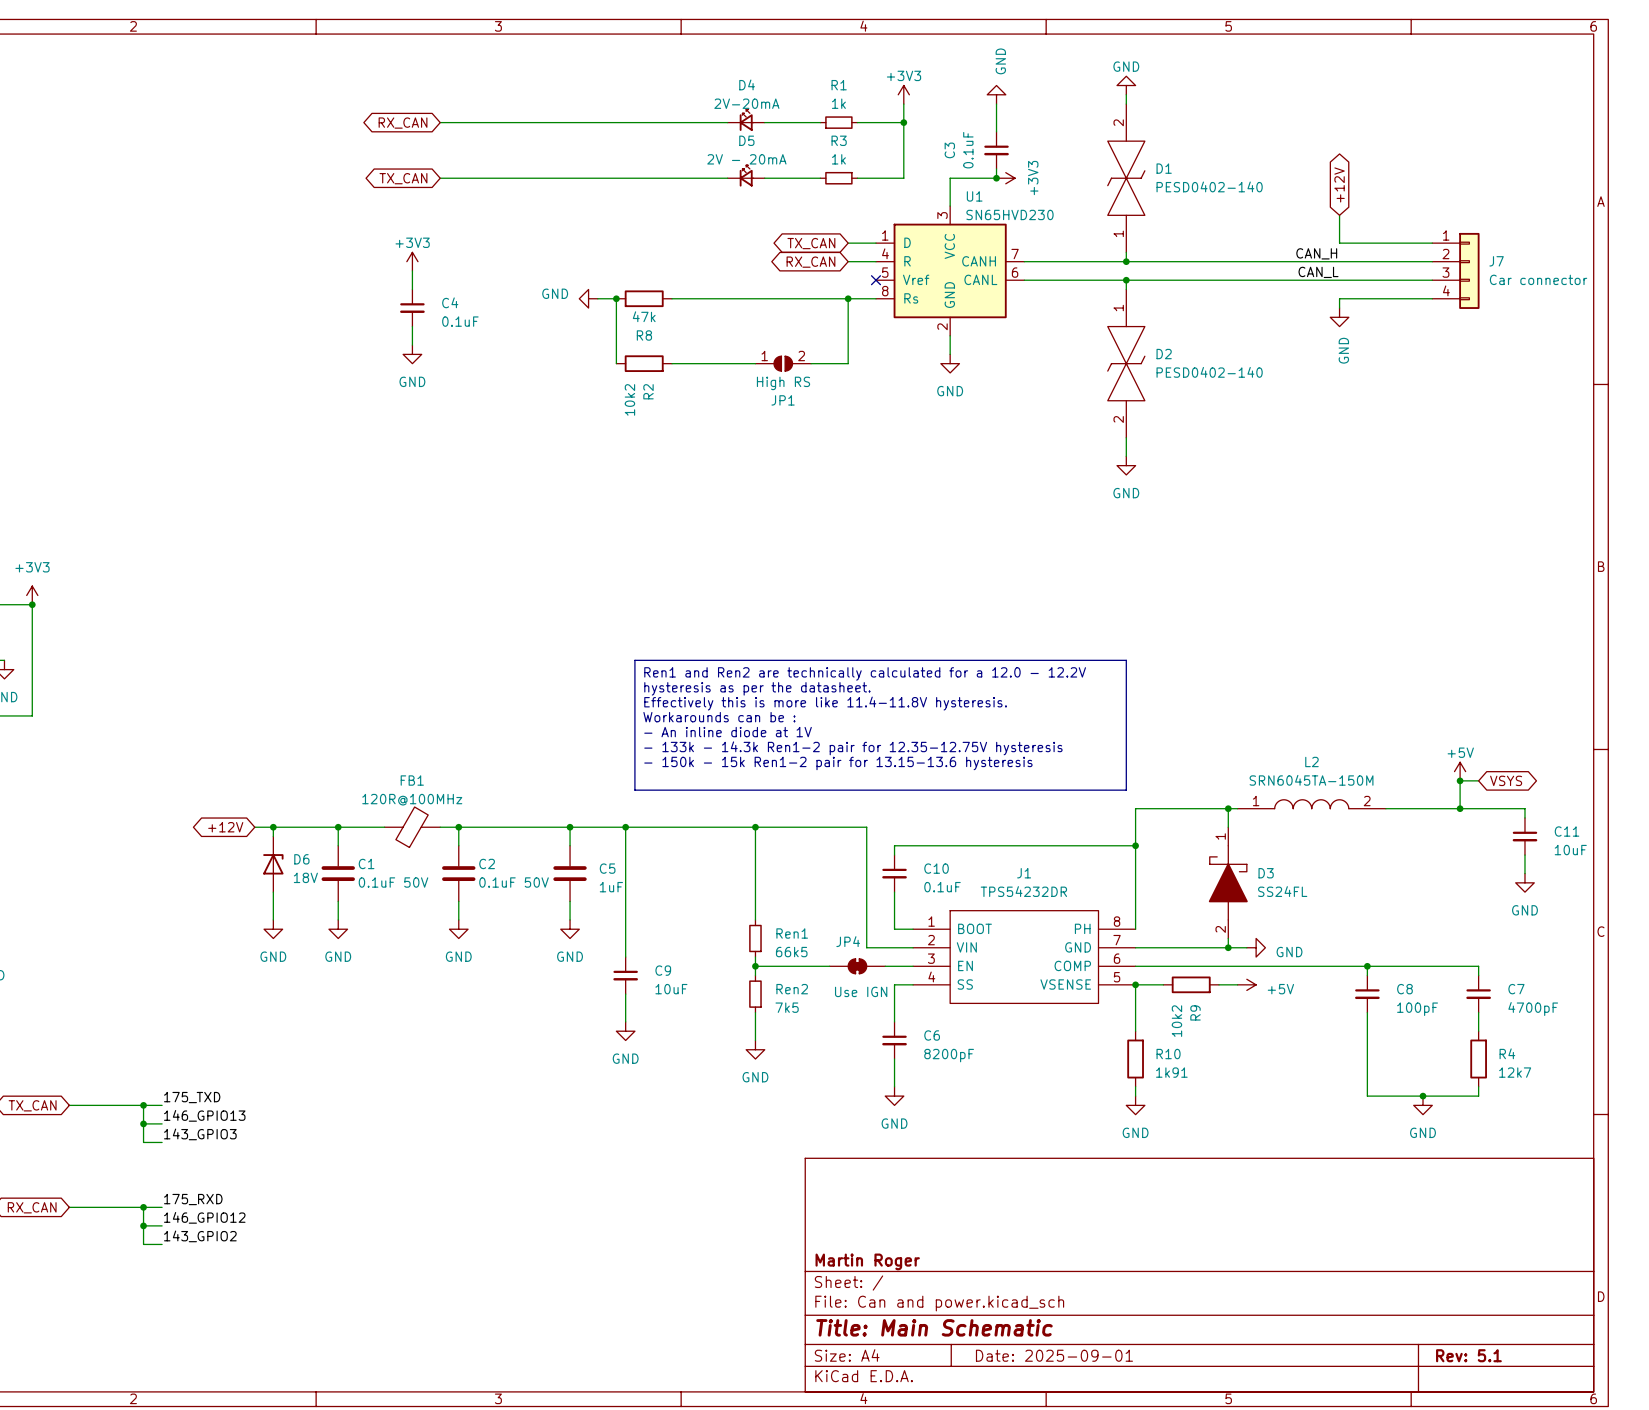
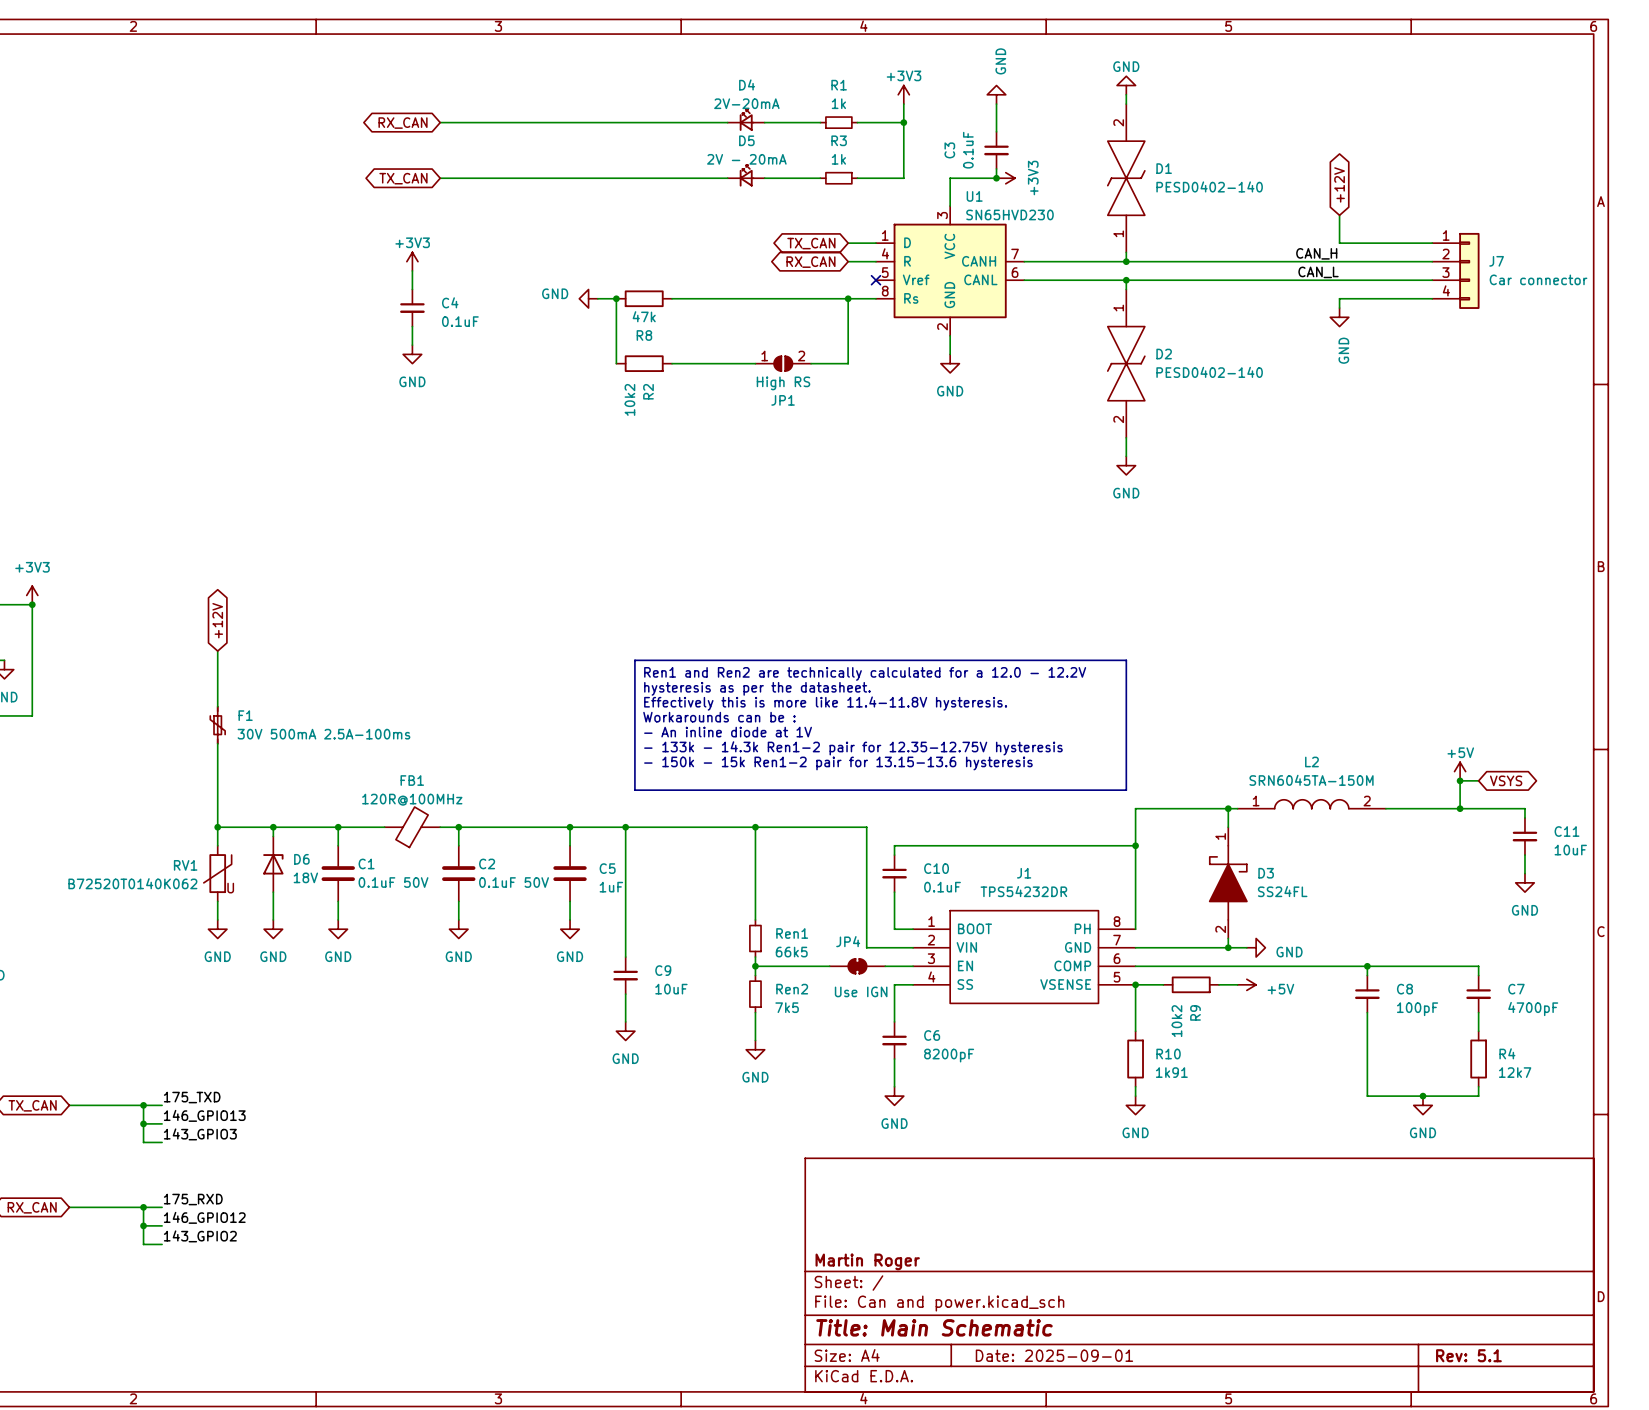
wire: none -> (217, 651) (217, 706)
F1: none -> 30V 500mA 2.5A-100ms (217, 725)
wire: none -> (217, 743) (217, 845)
wire: none -> (217, 827) (254, 827)
junction: none -> (217, 827)
global label rotation: 0° (225, 827) -> 90° clockwise (217, 620)
global label position: +12V (225, 827) -> +12V (217, 620)
RV1: none -> B72520T0140K062 (217, 873)
wire: none -> (217, 901) (217, 919)
power symbol: none -> GND (217, 929)

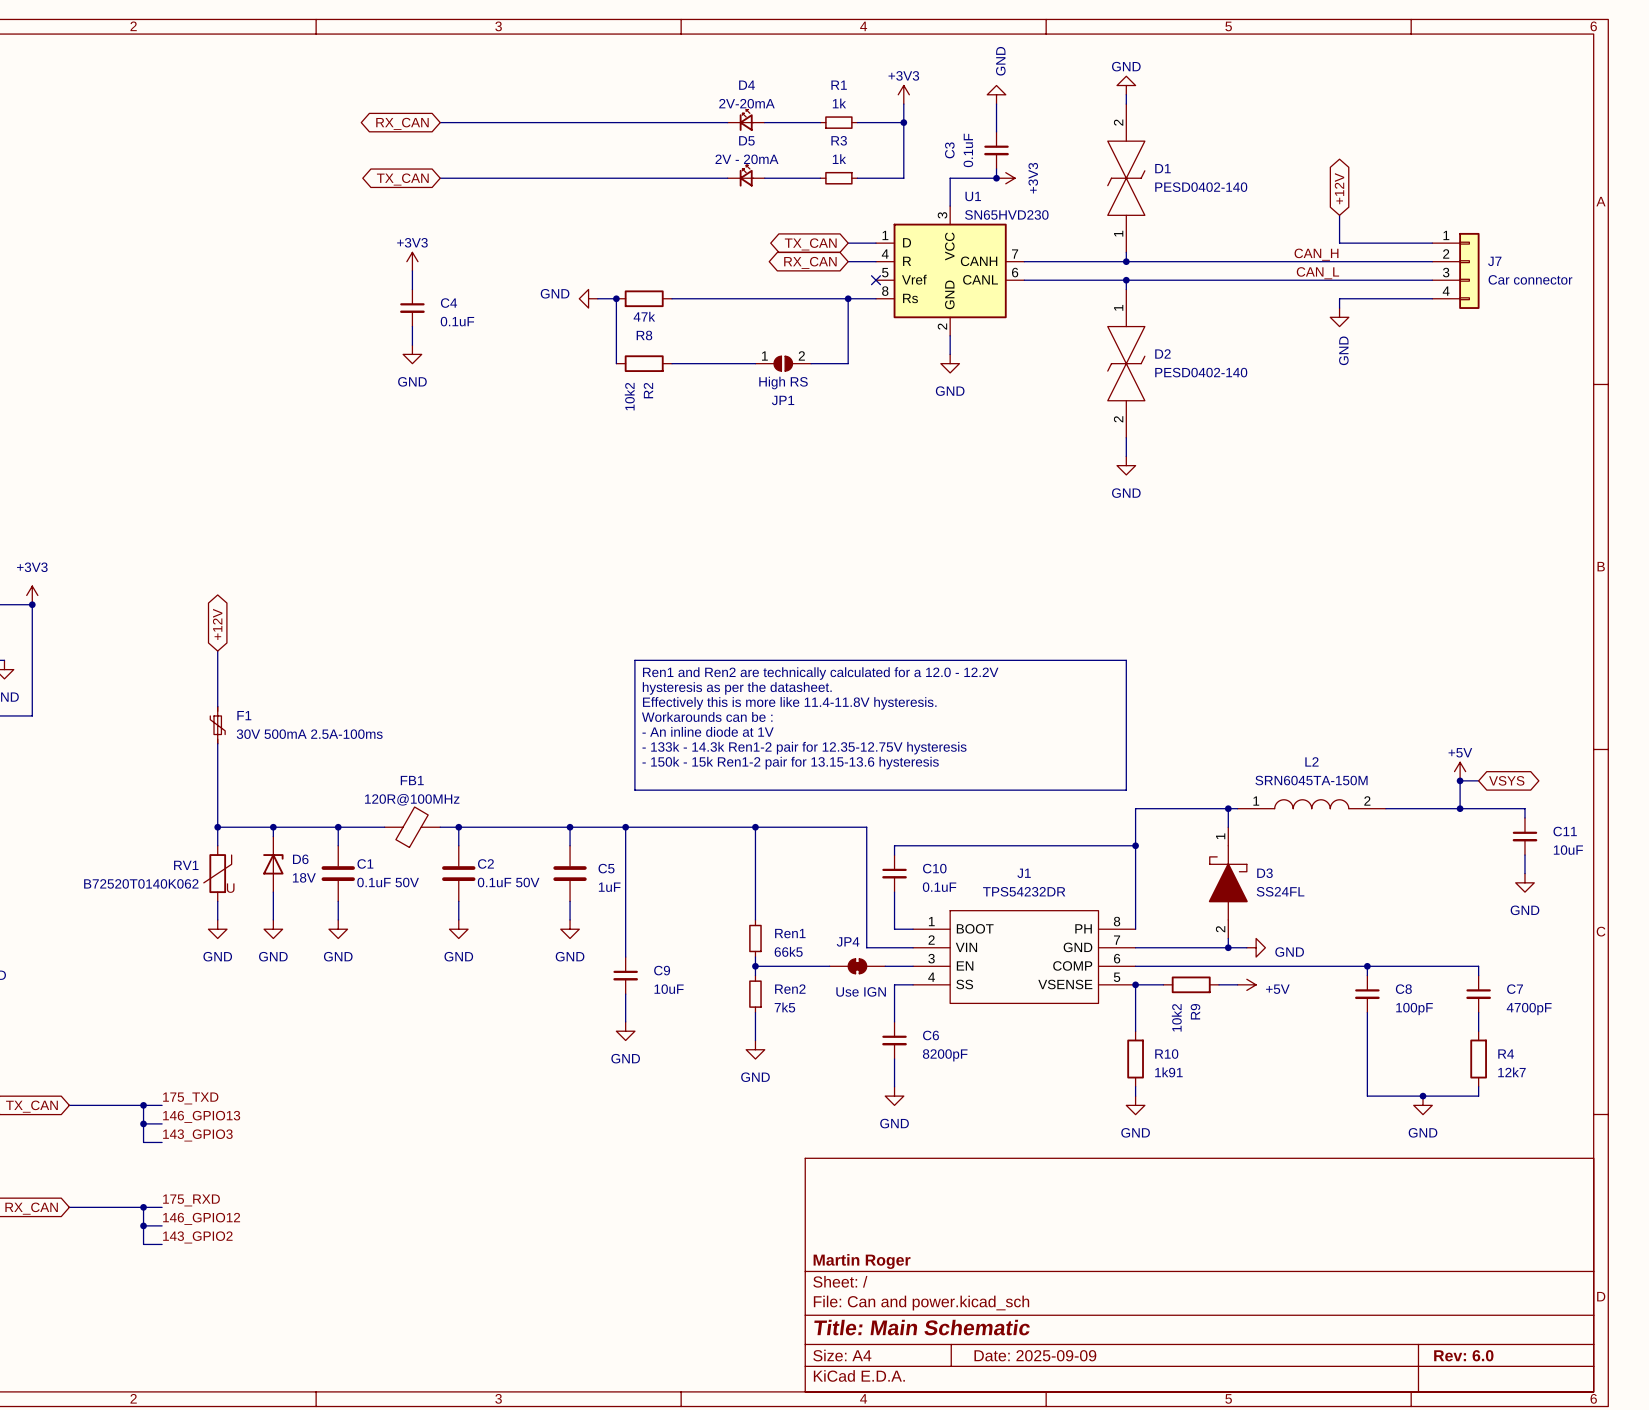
title block: Date: 2025-09-01 (1054, 1355) -> Date: 2025-09-09 (1035, 1355)
title block: Rev: 5.1 (1468, 1355) -> Rev: 6.0 (1463, 1355)

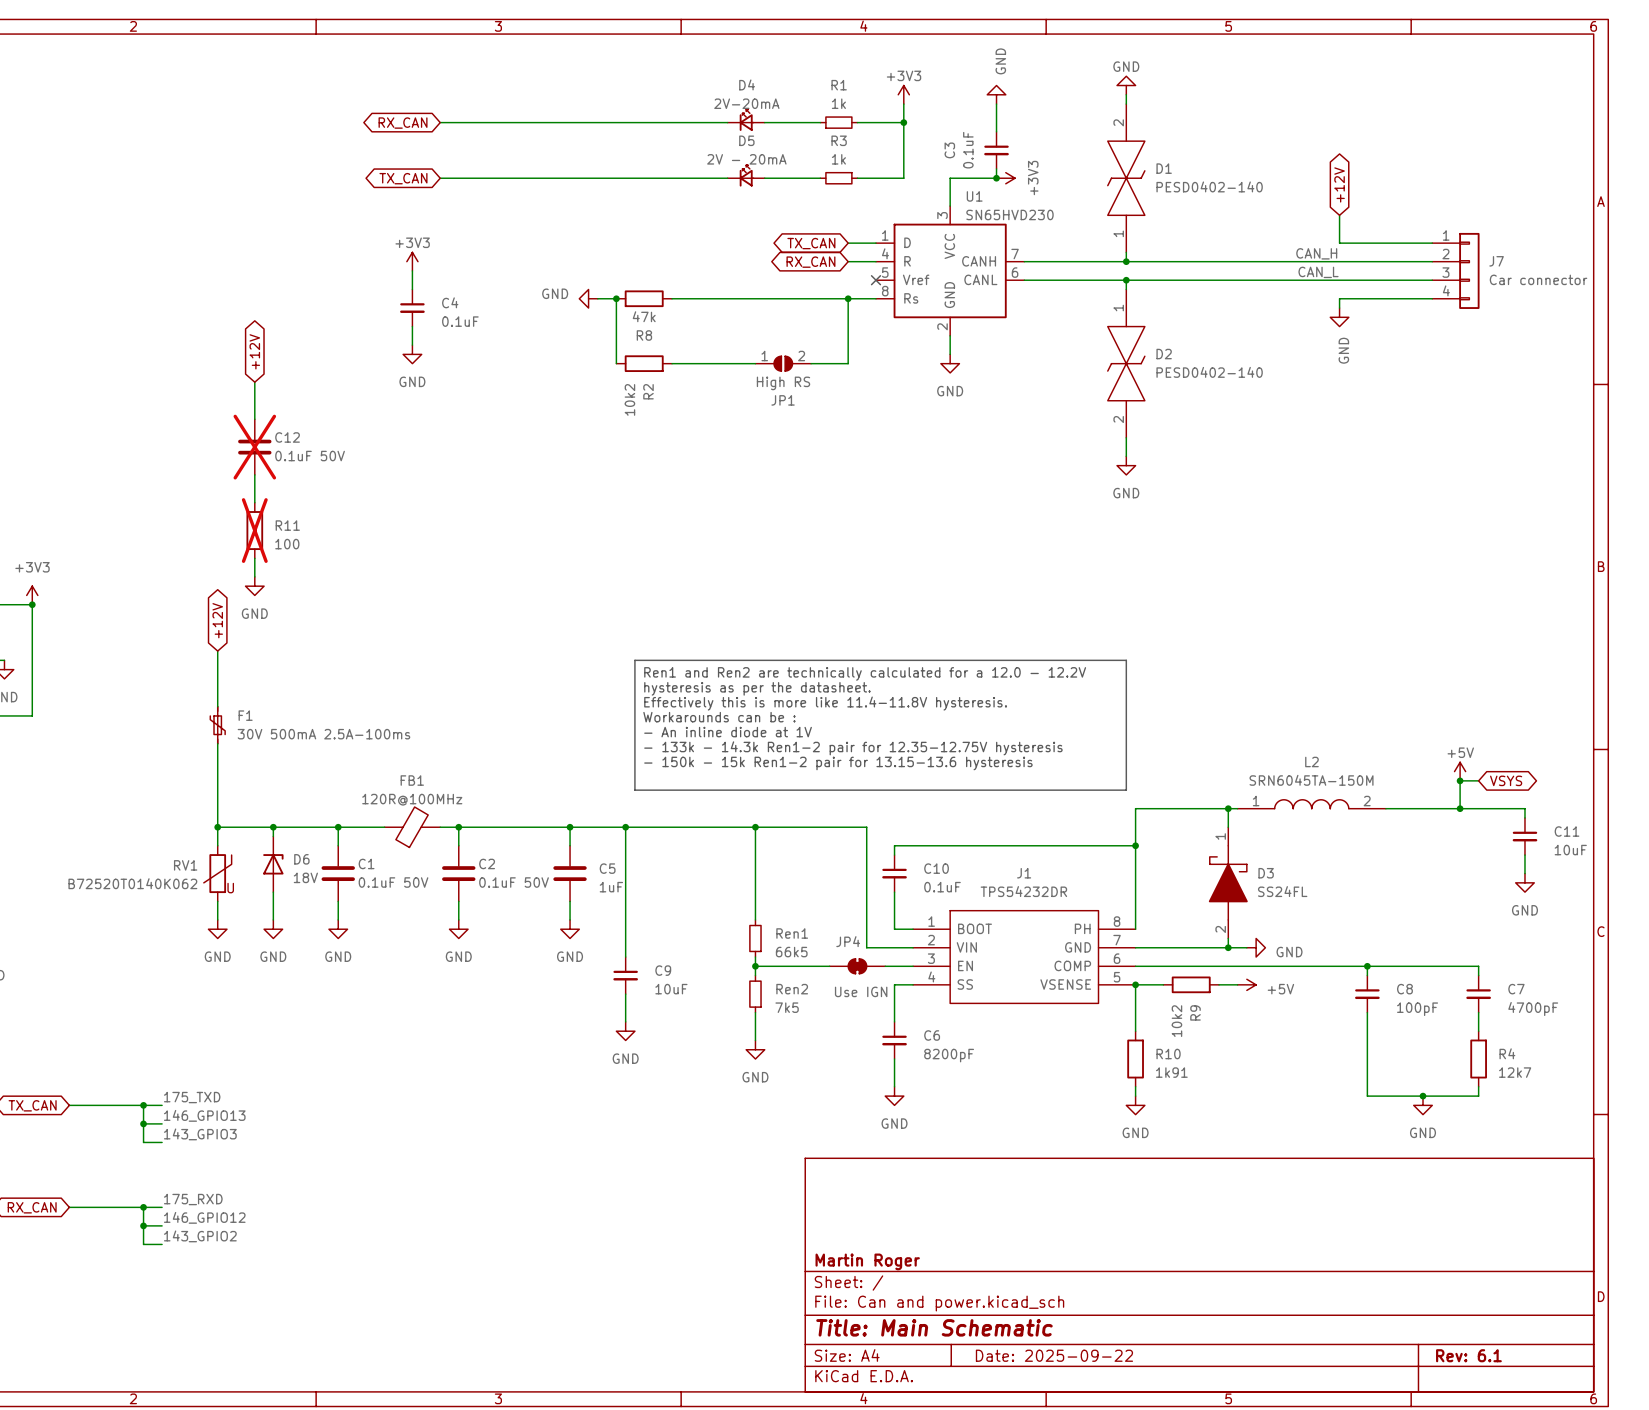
global label: none -> +12V (254, 351)
wire: none -> (254, 382) (254, 419)
C12: none -> 0.1uF 50V (254, 447)
wire: none -> (254, 474) (254, 502)
R11: none -> 100 (254, 530)
wire: none -> (254, 558) (254, 576)
power symbol: none -> GND (254, 586)
title block: Date: 2025-09-09 (1035, 1355) -> Date: 2025-09-22 (1054, 1355)
title block: Rev: 6.0 (1463, 1355) -> Rev: 6.1 (1468, 1355)

